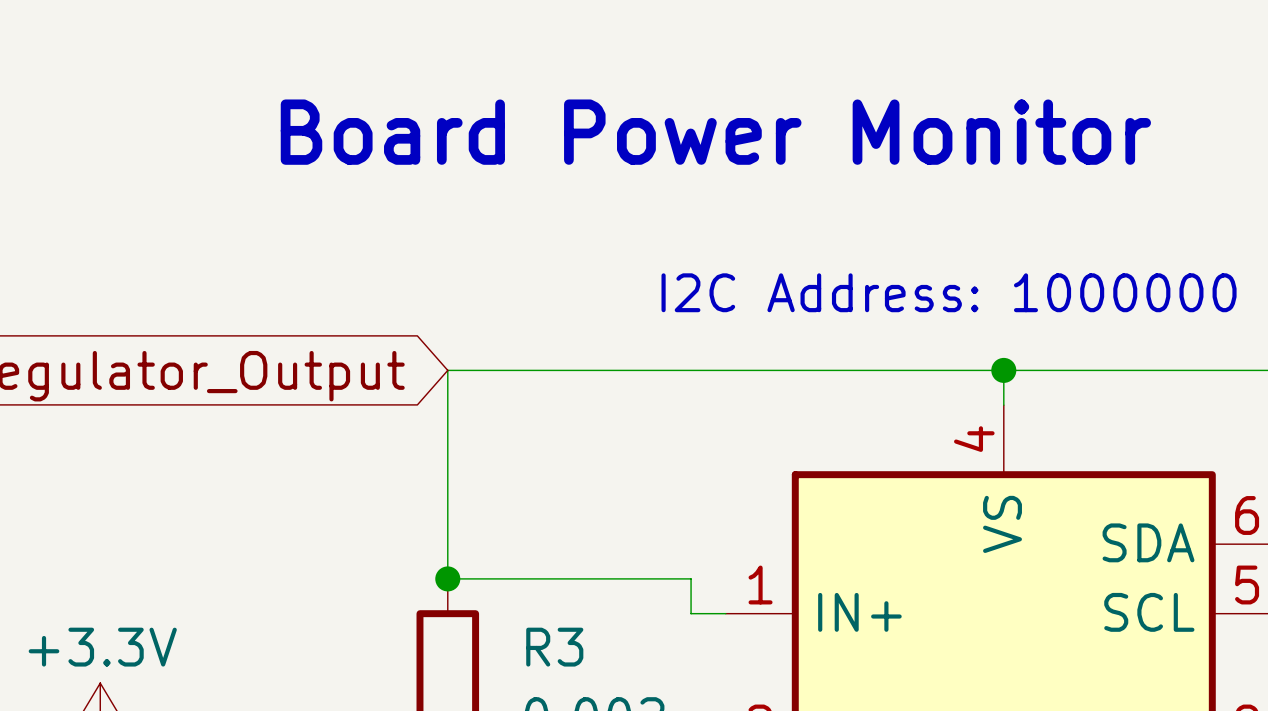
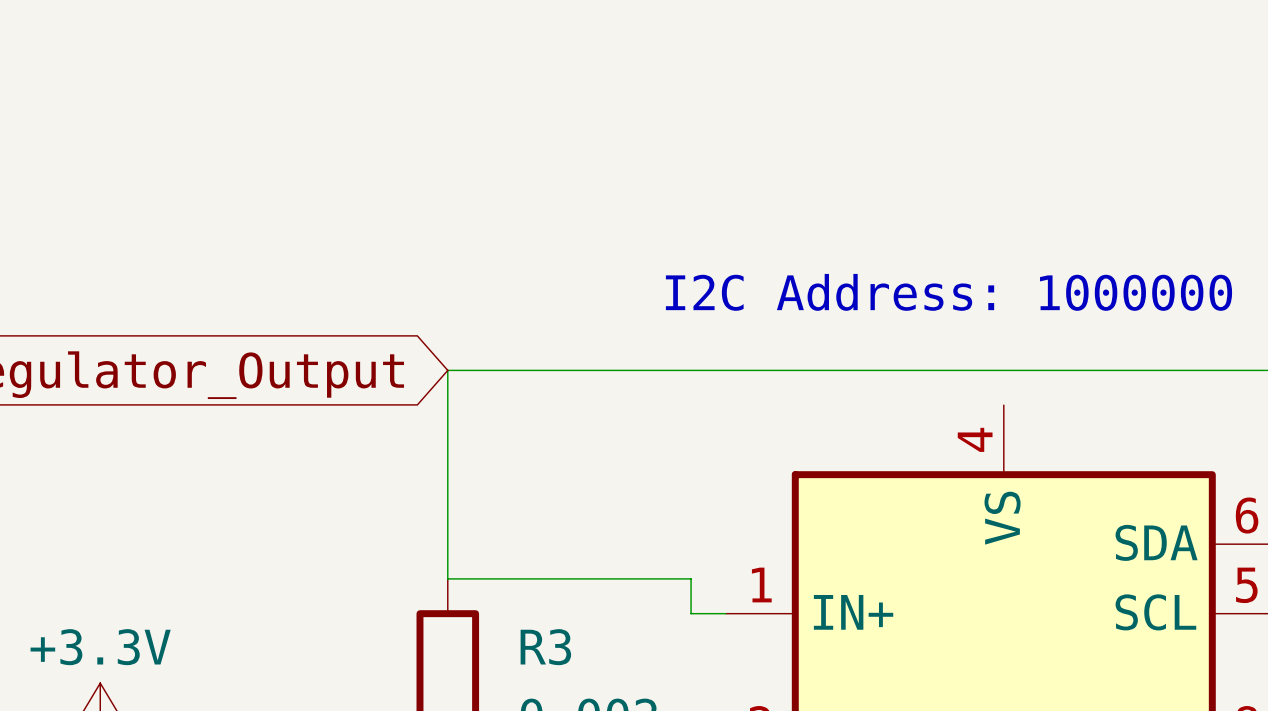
text: Board Power Monitor (715, 132) -> none
wire: (1003, 370) (1003, 405) -> none
junction: (1003, 370) -> none
junction: (447, 578) -> none

